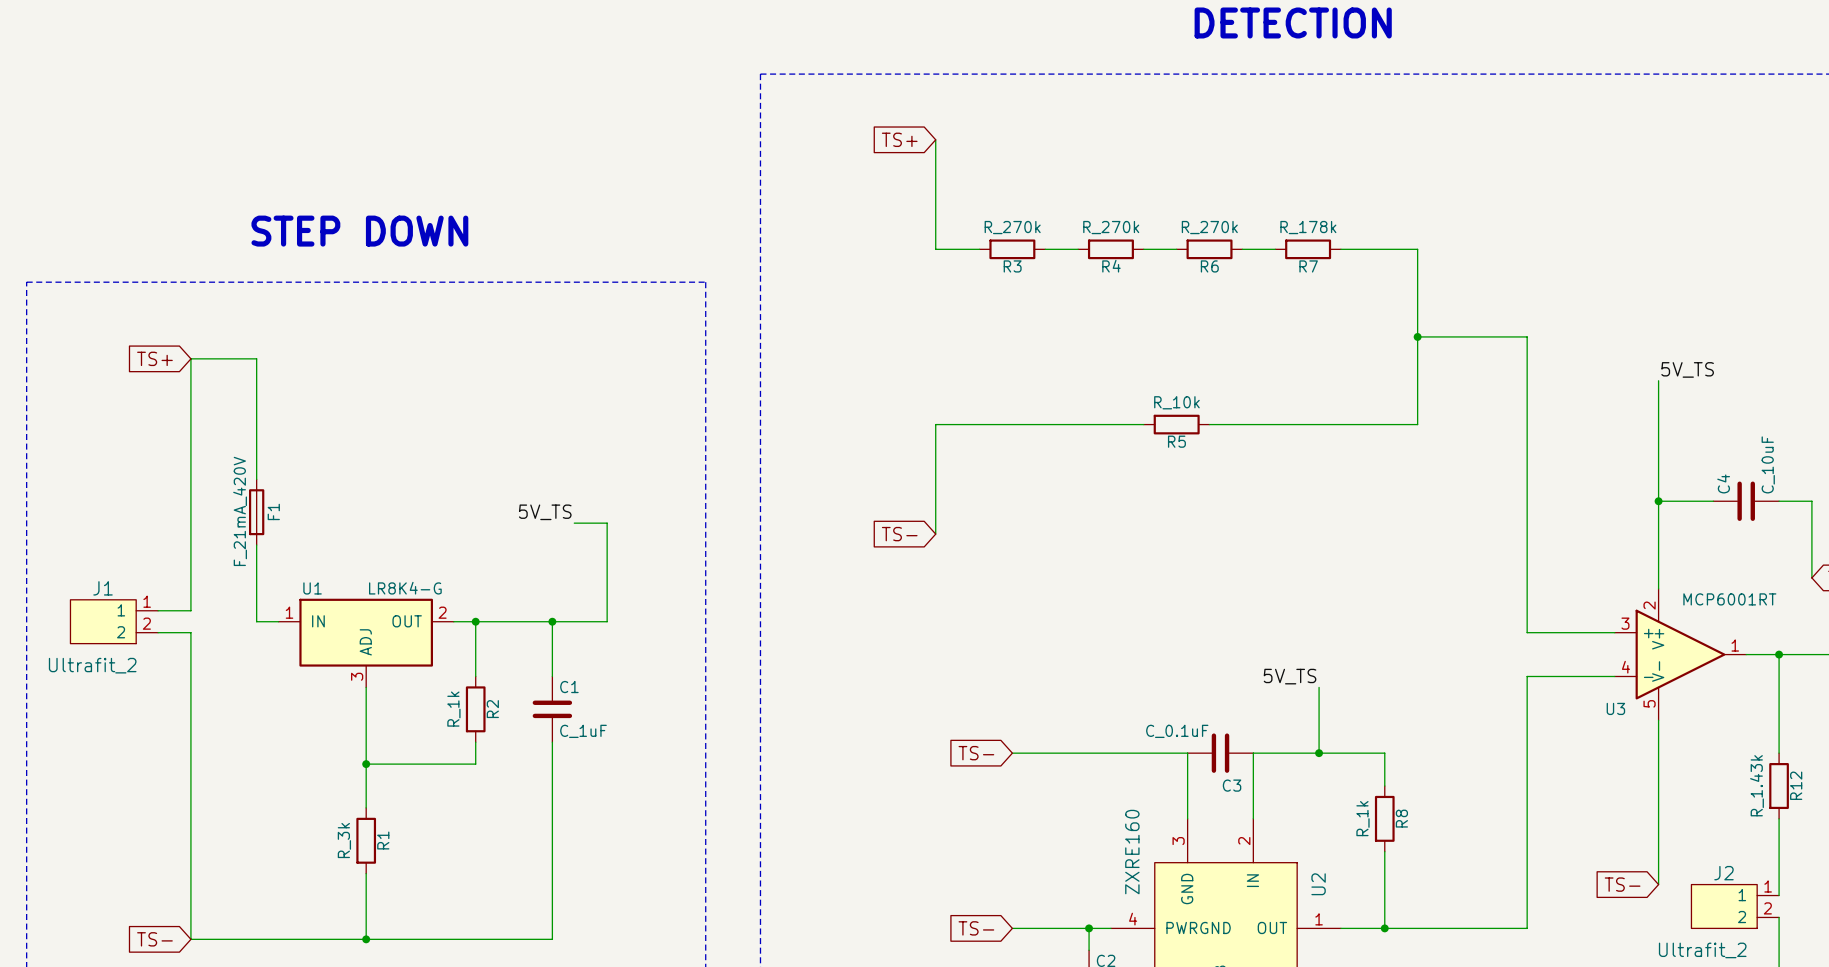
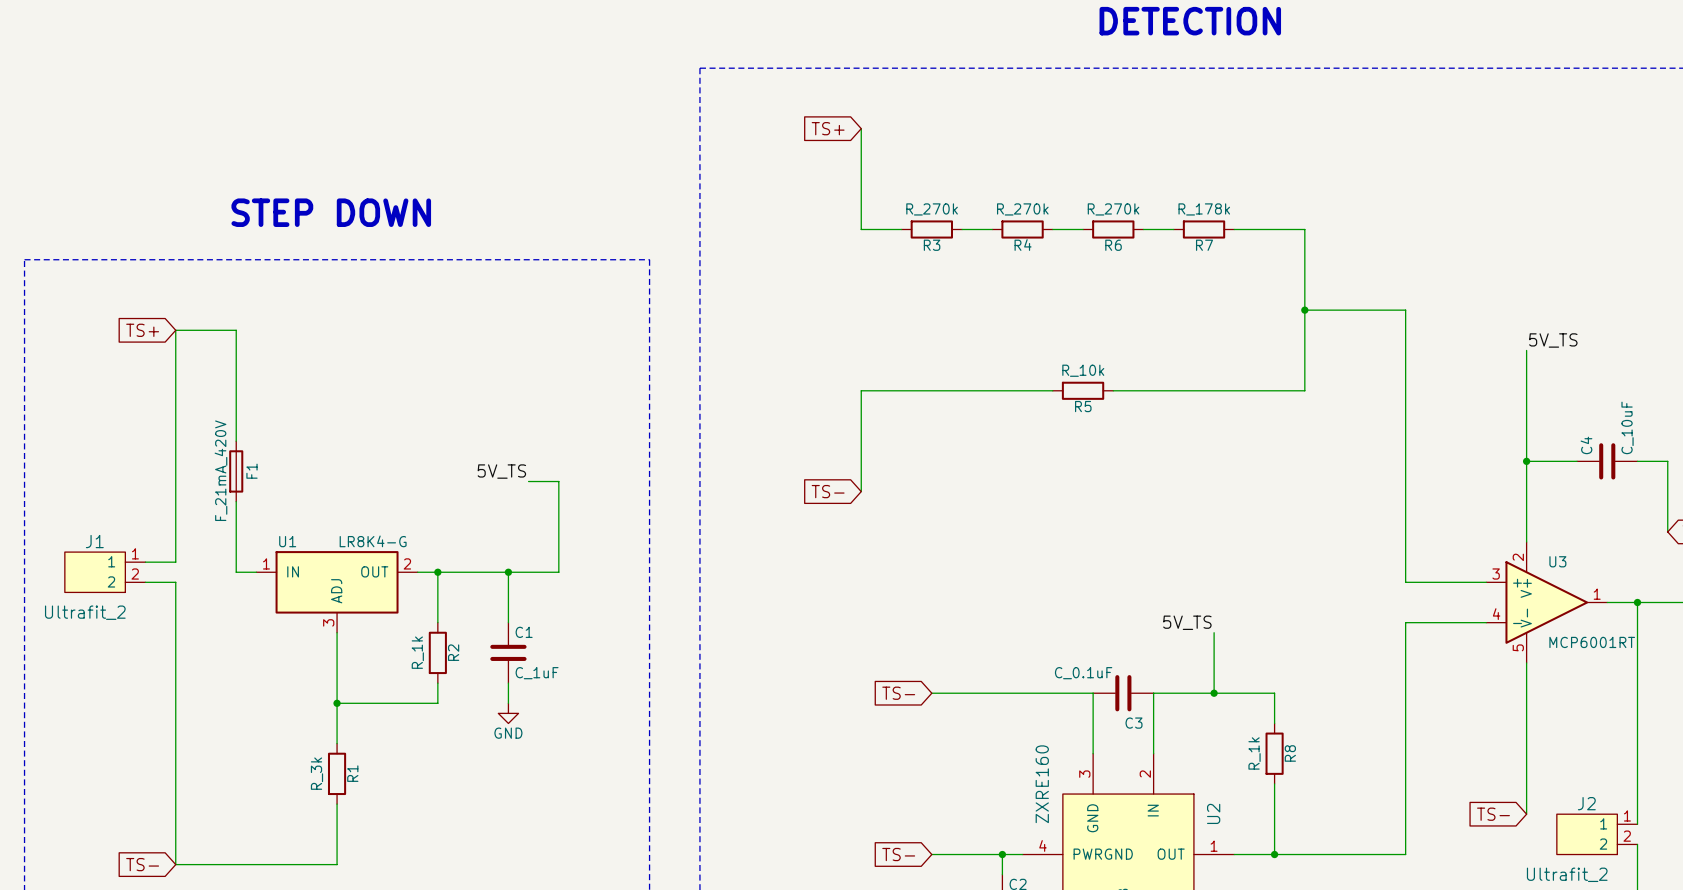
U3 value position: MCP6001RT (1729, 599) -> MCP6001RT (1592, 642)
U3 name position: U3 (1615, 708) -> U3 (1557, 561)
wire: none -> (1637, 693) (1637, 753)
wire: (552, 764) (552, 939) (366, 939) -> none
power symbol: none -> GND (508, 713)
R12: R_1.43k (1779, 786) -> none
junction: (366, 939) -> none

